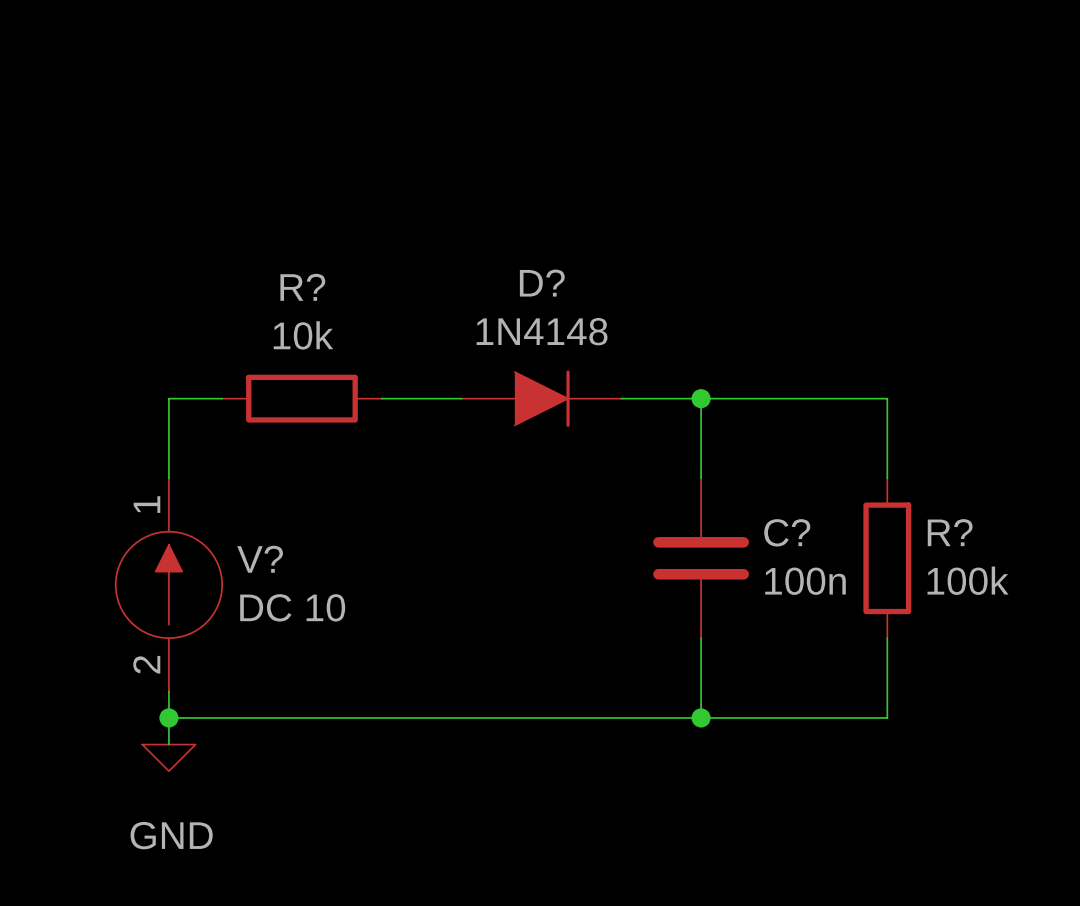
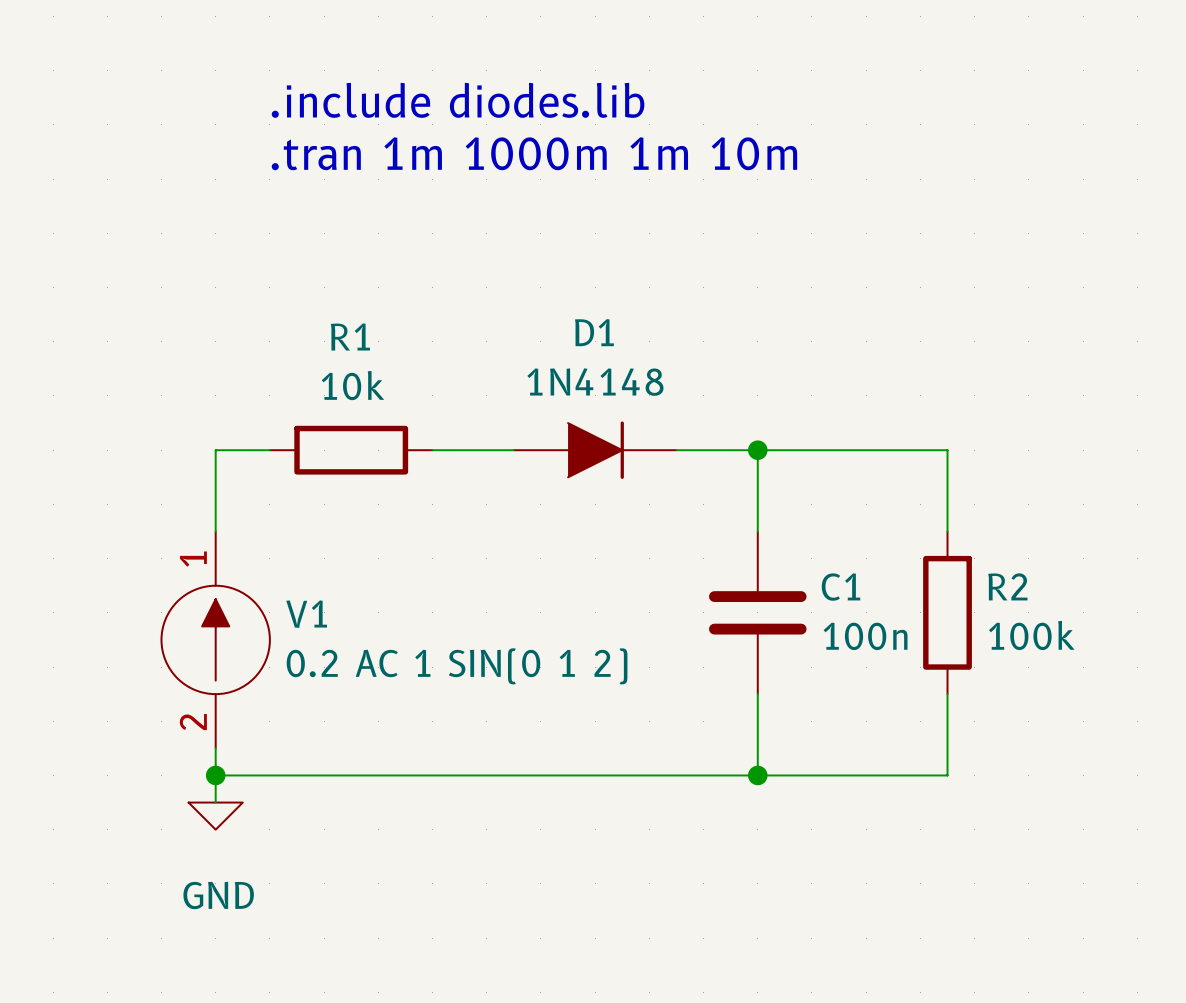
text: none -> .include diodes.lib (458, 100)
text: none -> .tran 1m 1000m 1m 10m (534, 153)
D? name: D? (542, 283) -> D1 (594, 332)
R? name: R? (302, 287) -> R1 (350, 336)
C? name: C? (787, 532) -> C1 (840, 587)
R? name: R? (950, 532) -> R2 (1007, 586)
V? name: V? (260, 559) -> V1 (306, 614)
V? value: DC 10 (292, 607) -> 0.2 AC 1 SIN(0 1 2) (457, 666)

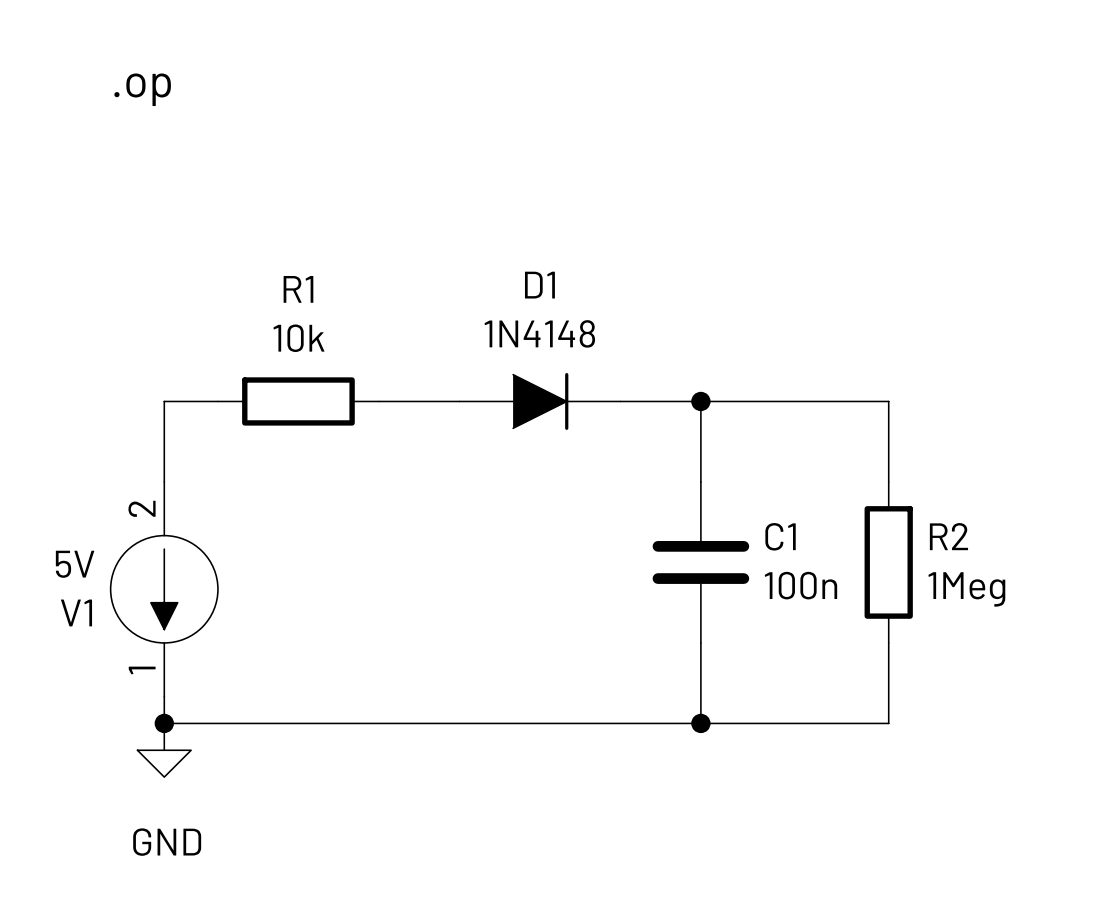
text: .include diodes.lib (458, 100) -> none
text: none -> .op (142, 89)
text: .tran 1m 1000m 1m 10m (534, 153) -> none
R2 value: 100k (1031, 635) -> 1Meg (966, 589)
V1 rotation: 0° (215, 639) -> 180° (164, 589)
V1 value: 0.2 AC 1 SIN(0 1 2) (457, 666) -> 5V (75, 564)

